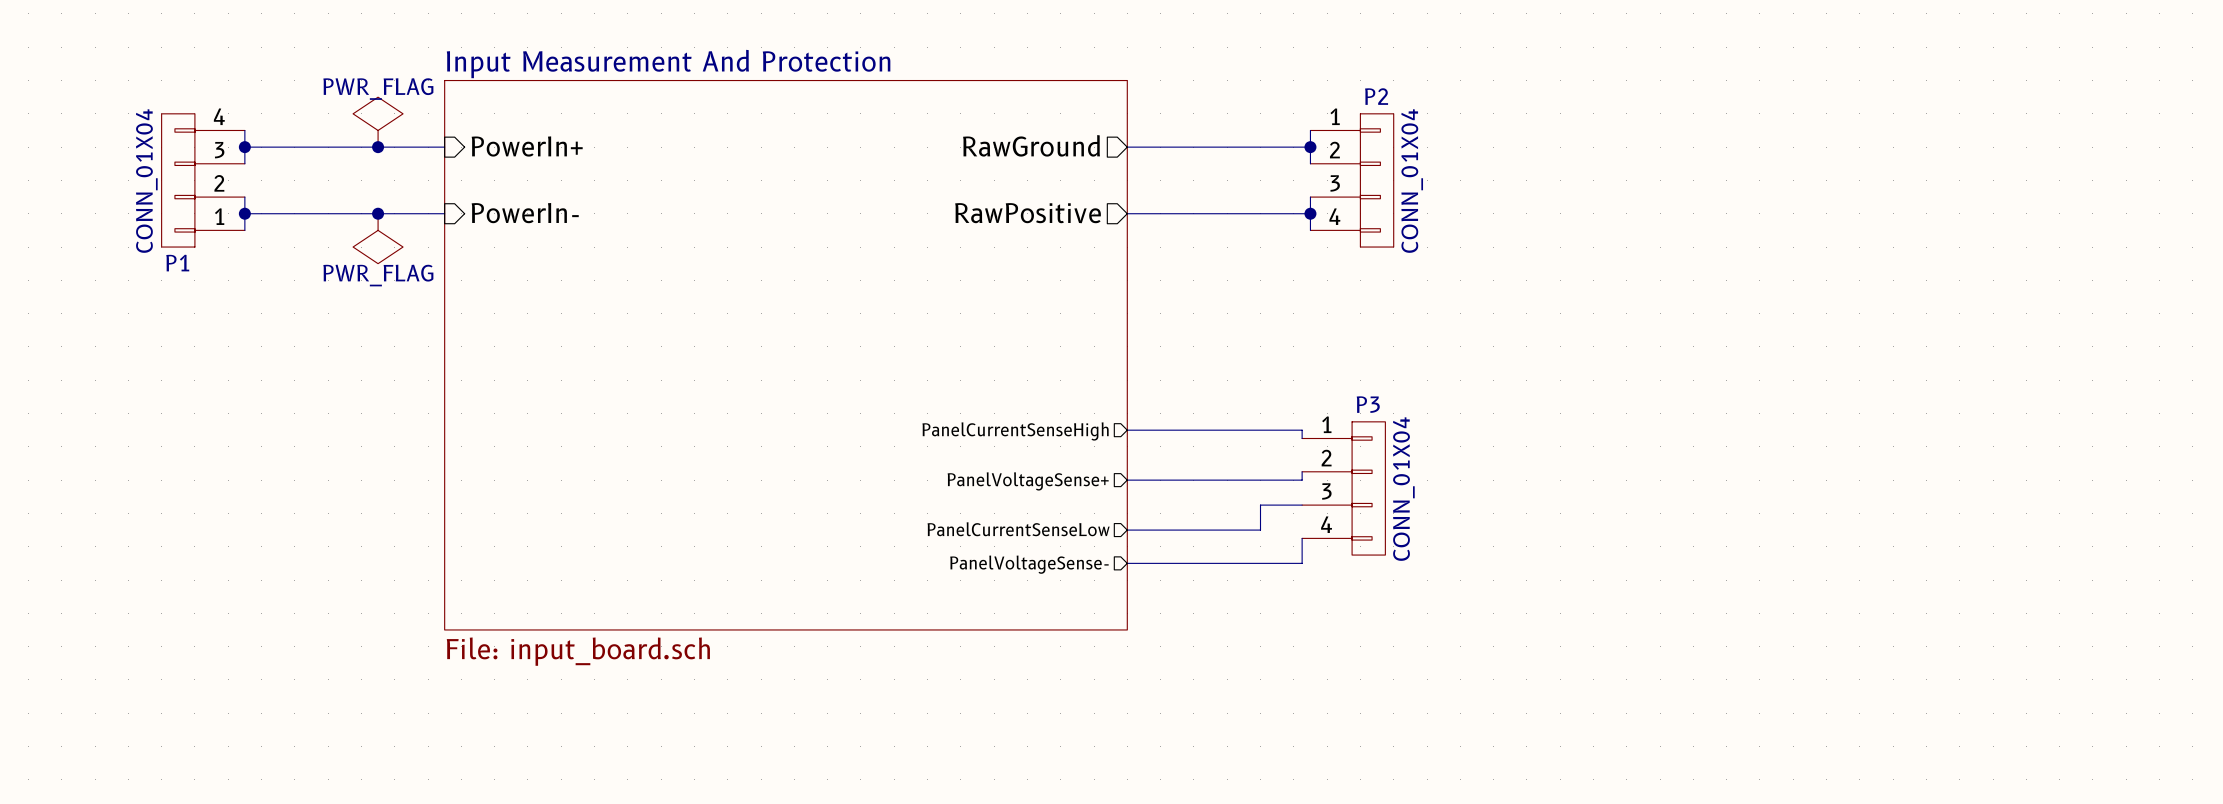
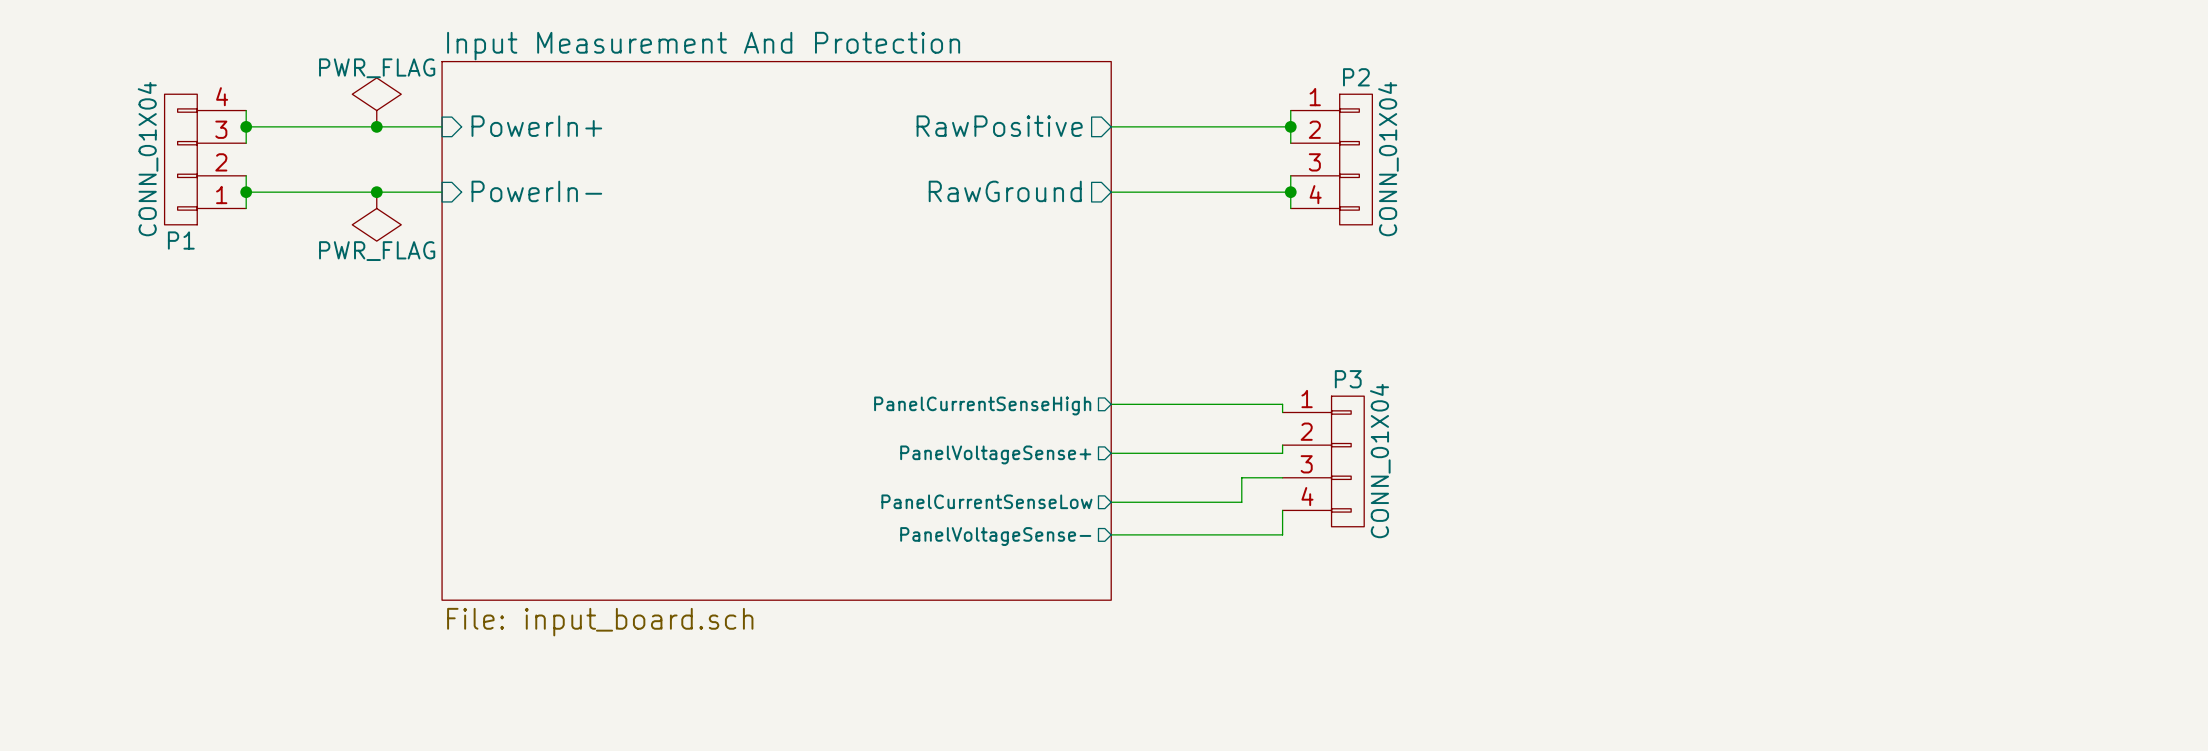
sheet pin: RawGround (1031, 145) -> RawPositive (999, 126)
sheet pin: RawPositive (1028, 213) -> RawGround (1005, 191)

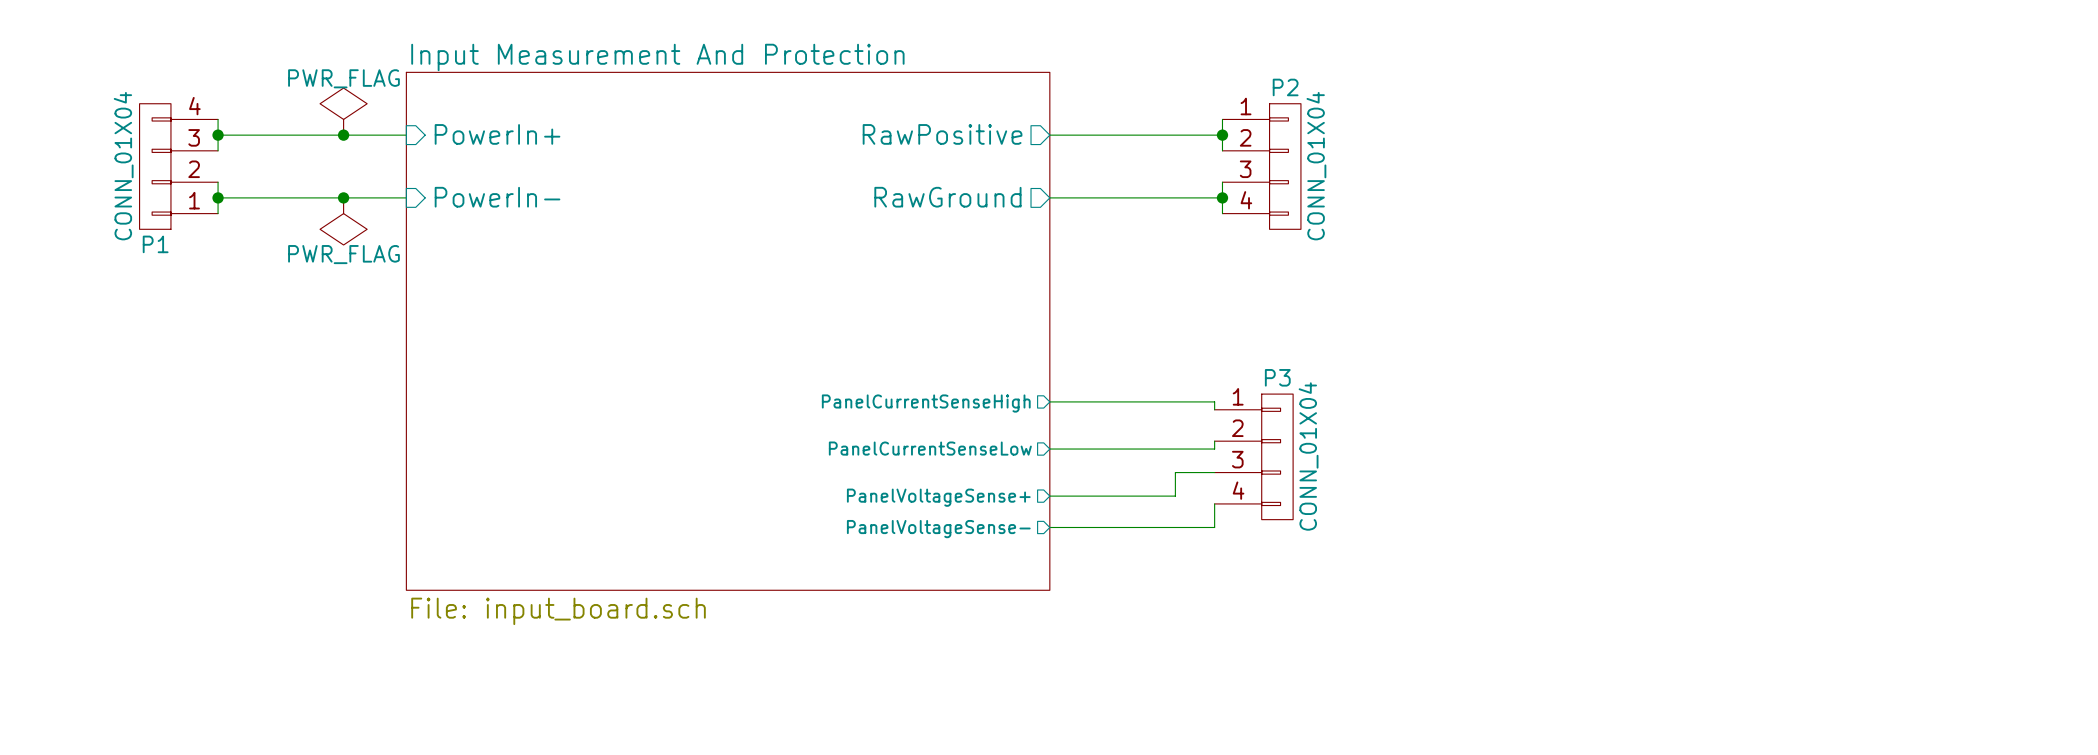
sheet pin: PanelVoltageSense+ (995, 454) -> PanelCurrentSenseLow (930, 448)
sheet pin: PanelCurrentSenseLow (986, 501) -> PanelVoltageSense+ (938, 497)

